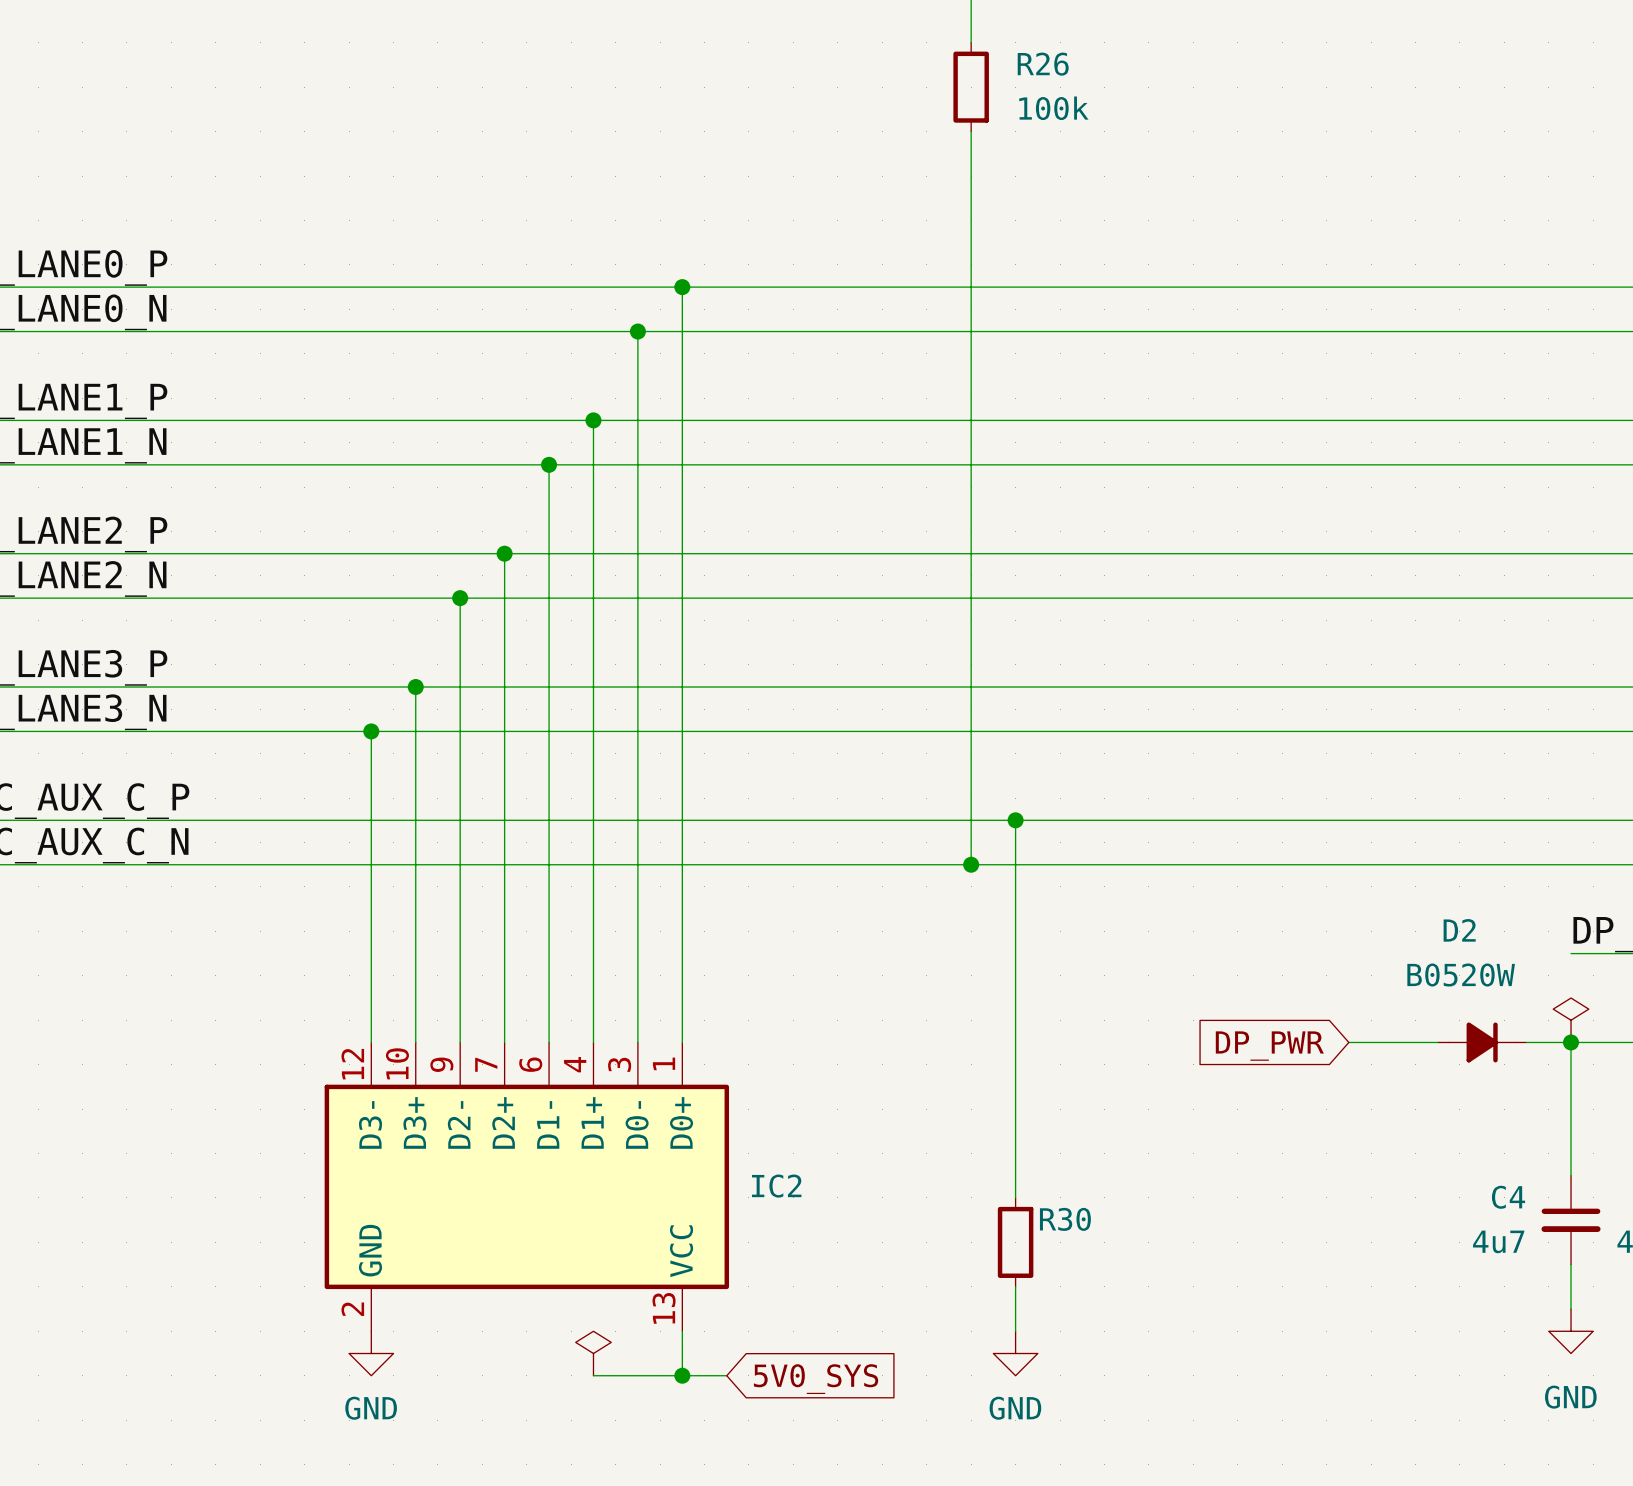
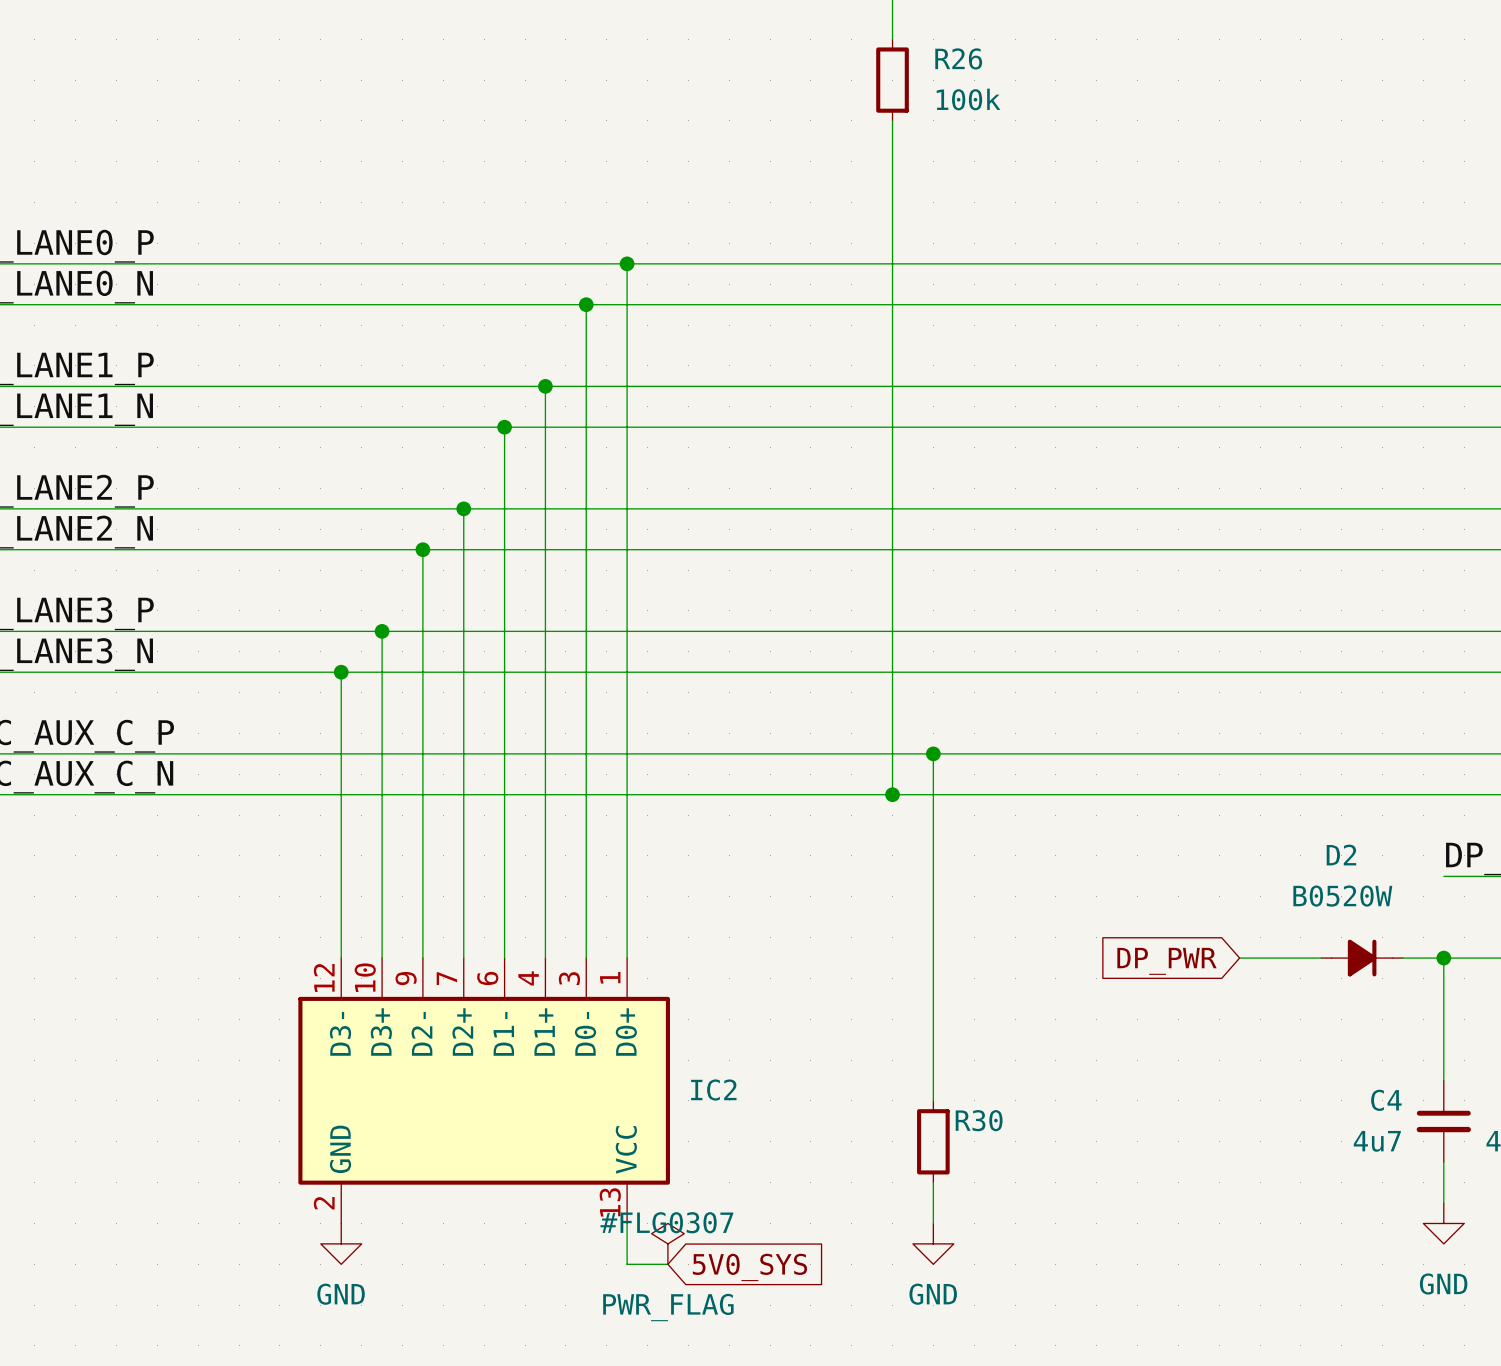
power symbol: (1571, 1020) -> none
power symbol: (593, 1353) -> none
#FLG0307: none -> PWR_FLAG (667, 1243)
wire: (593, 1375) (682, 1375) -> none
junction: (682, 1375) -> none

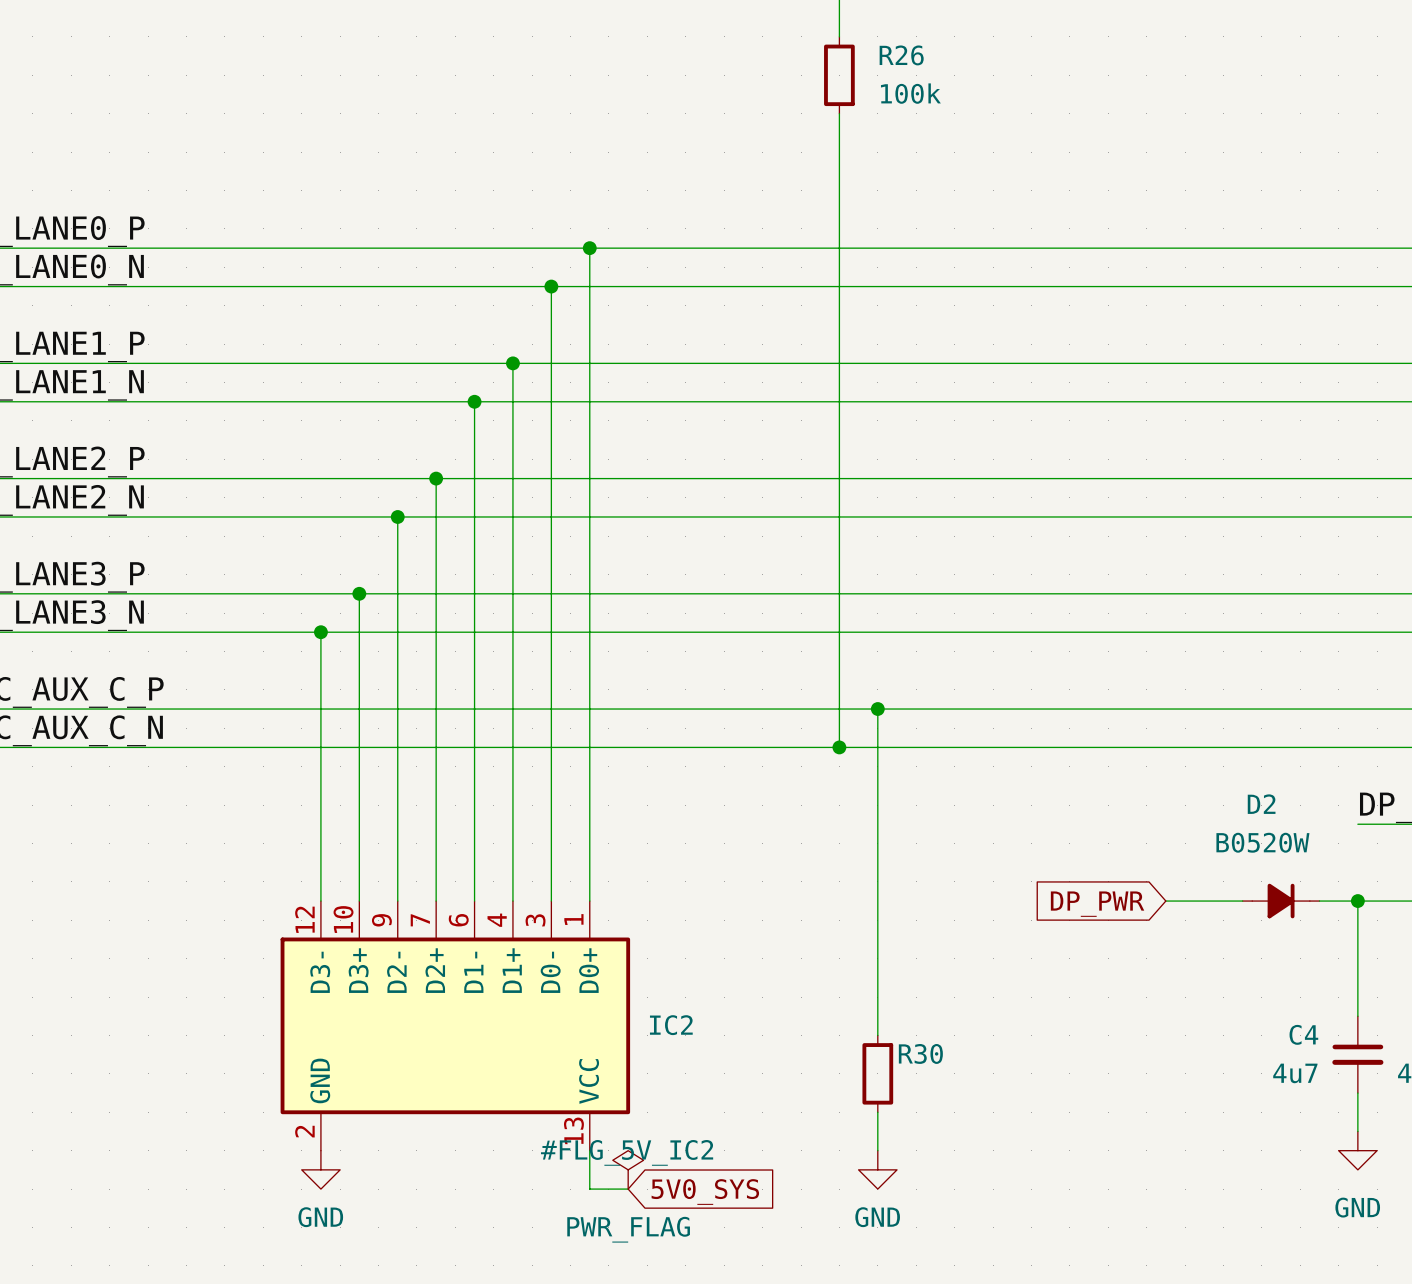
#FLG0307 name: #FLG0307 (666, 1222) -> #FLG_5V_IC2 (627, 1152)

